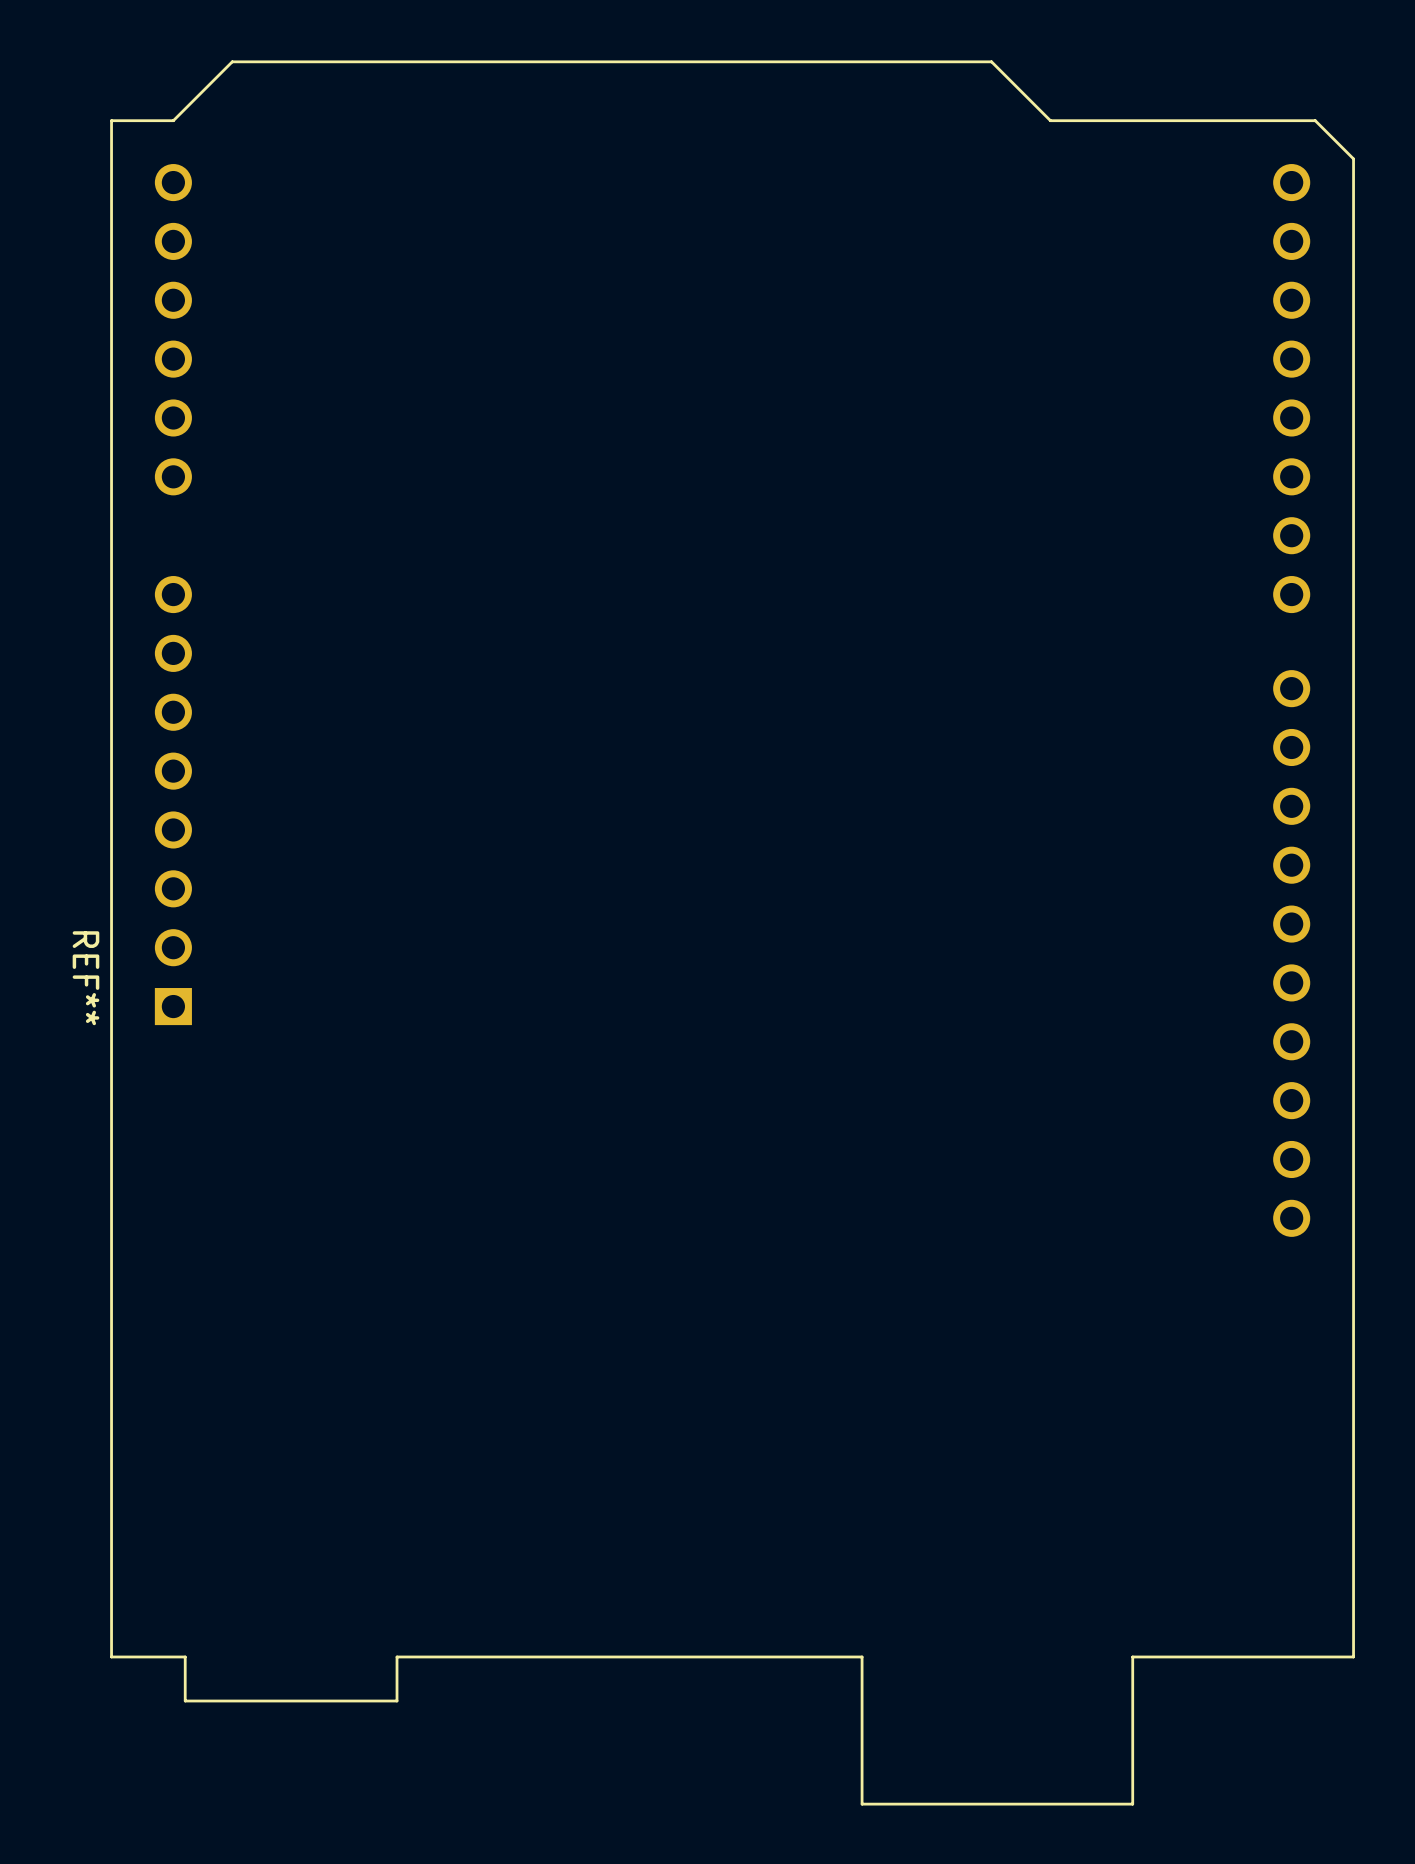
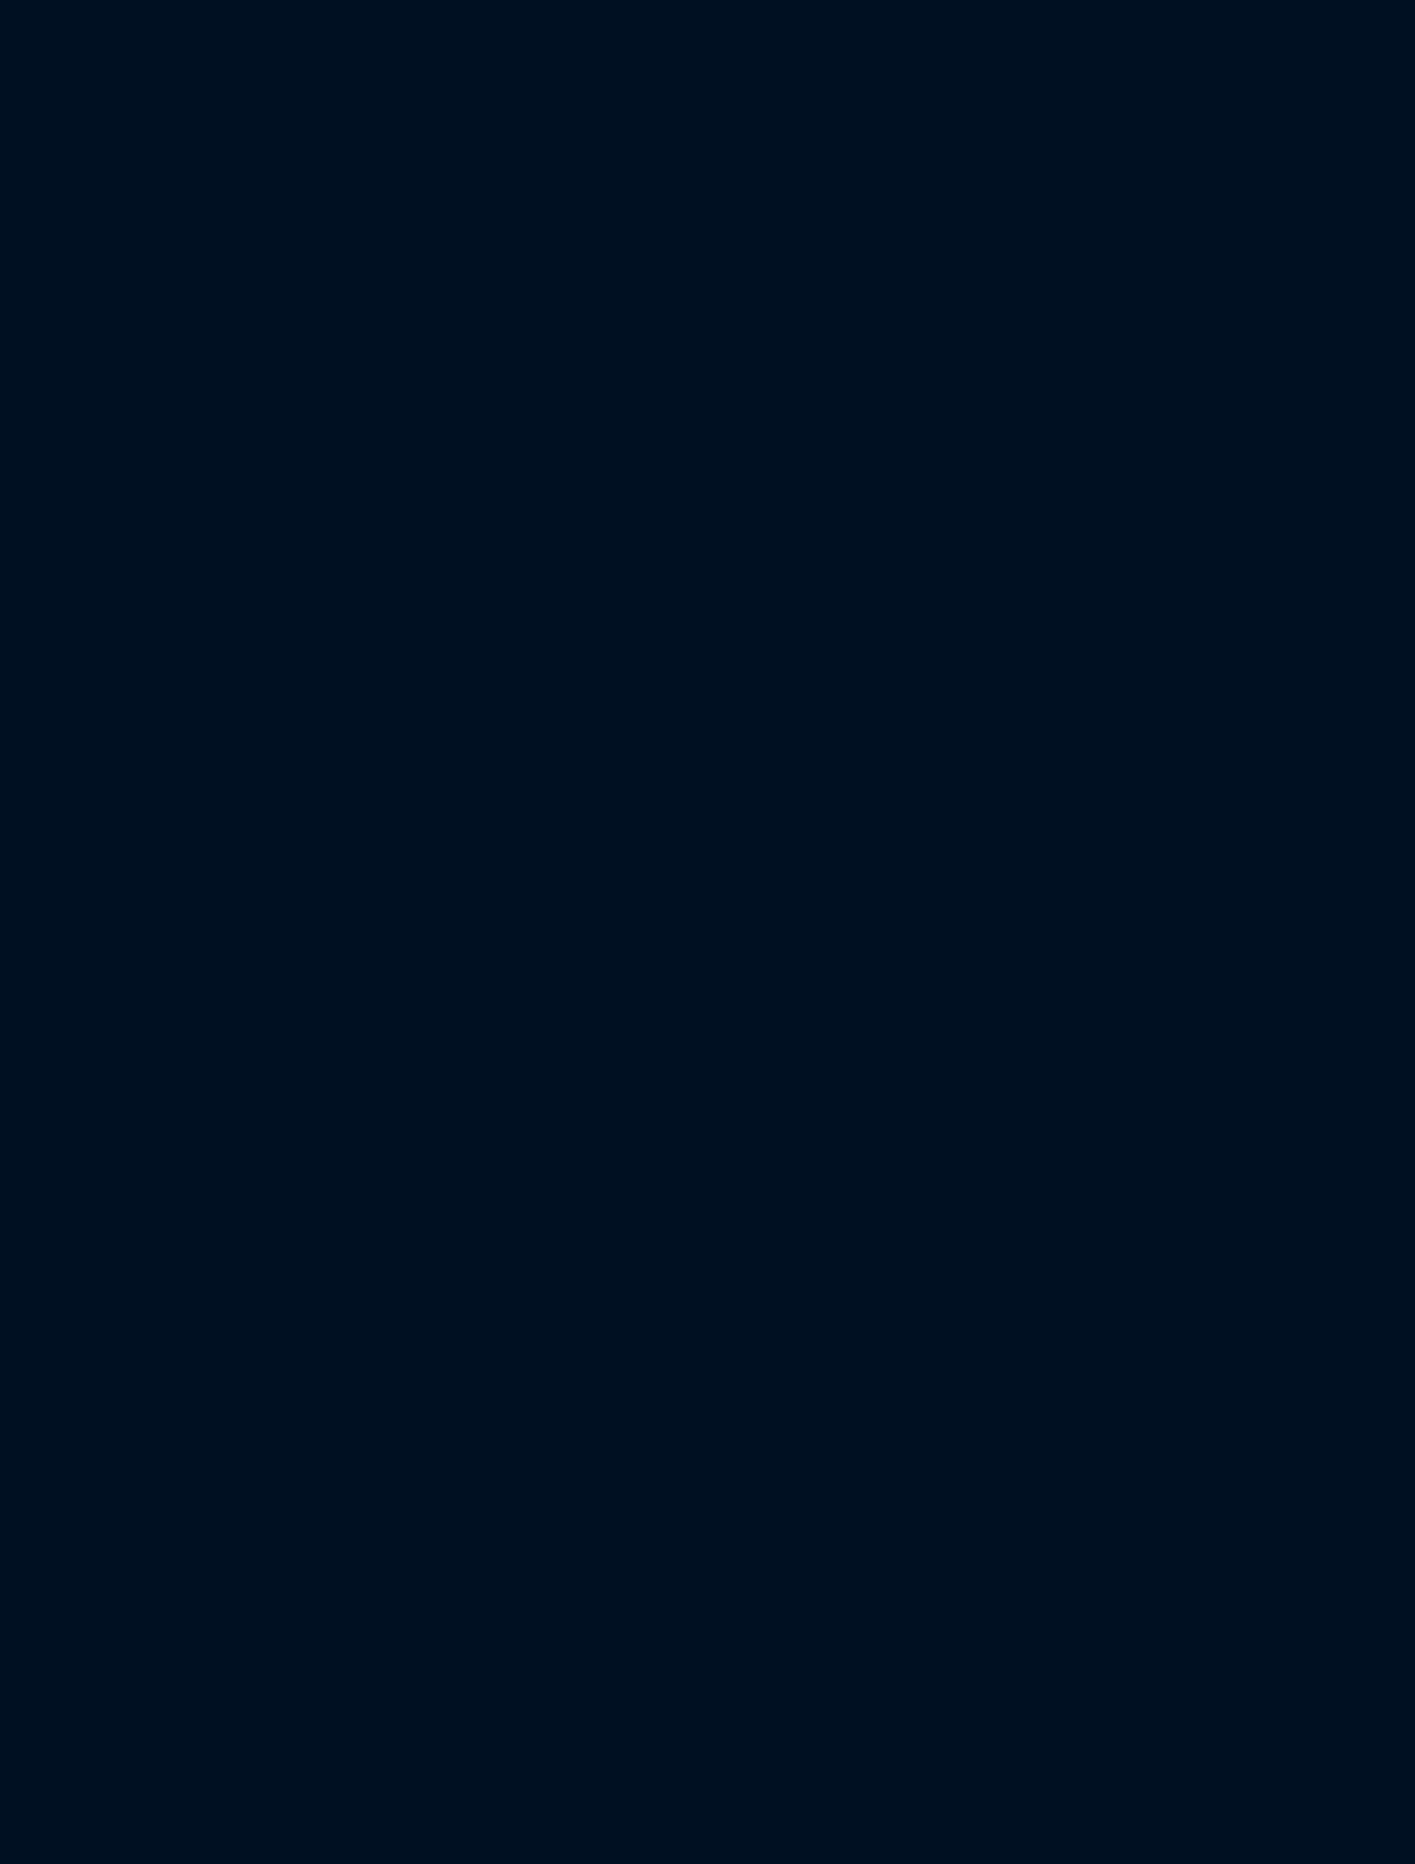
REF**: (732, 932) -> none

